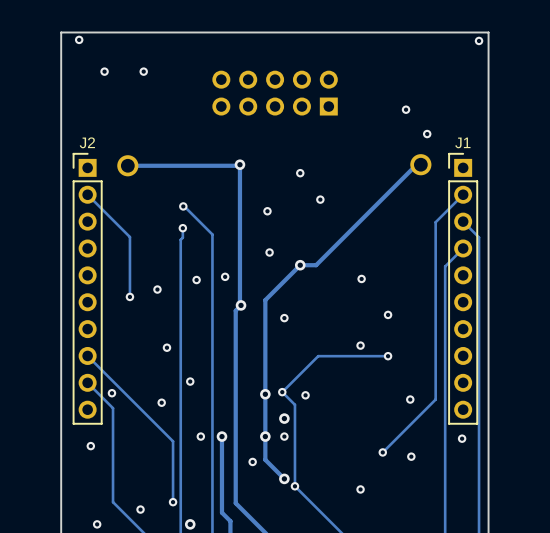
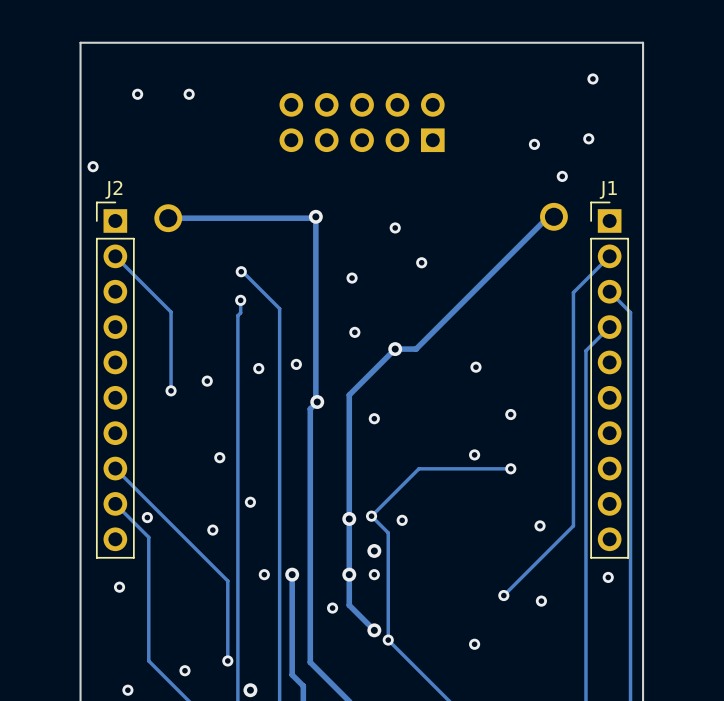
via: (79, 39) -> none
via position: (479, 40) -> (592, 78)
via: none -> (588, 138)
via: none -> (93, 166)

